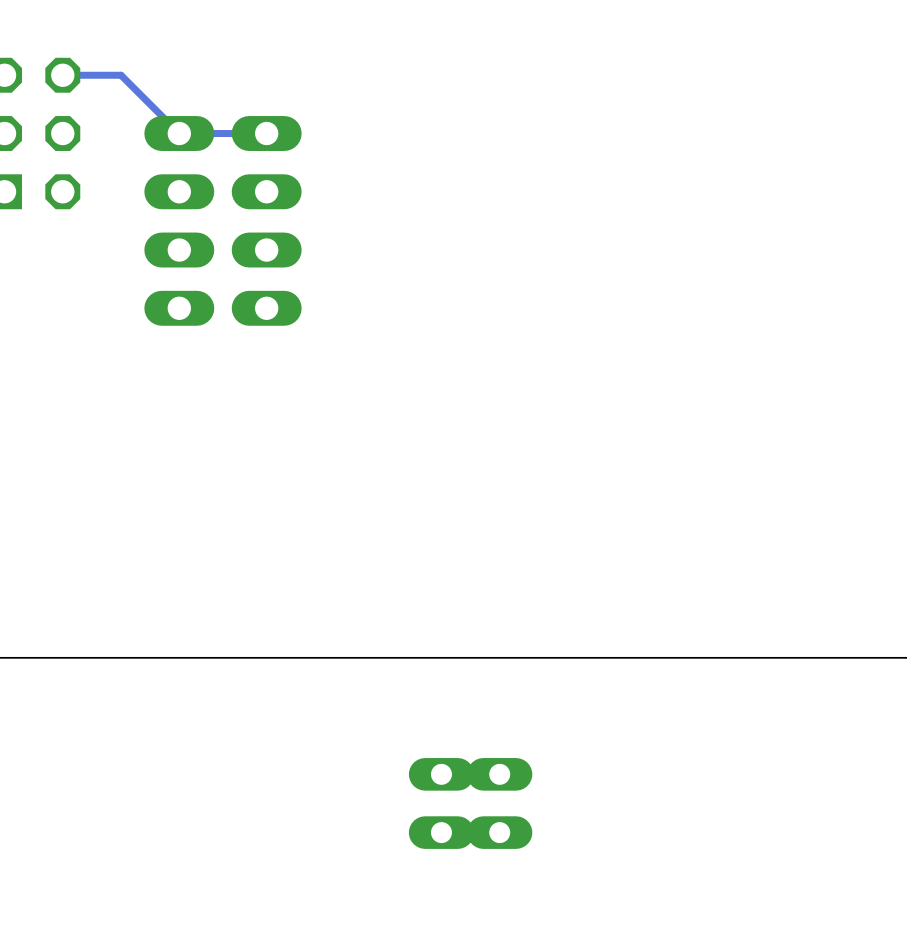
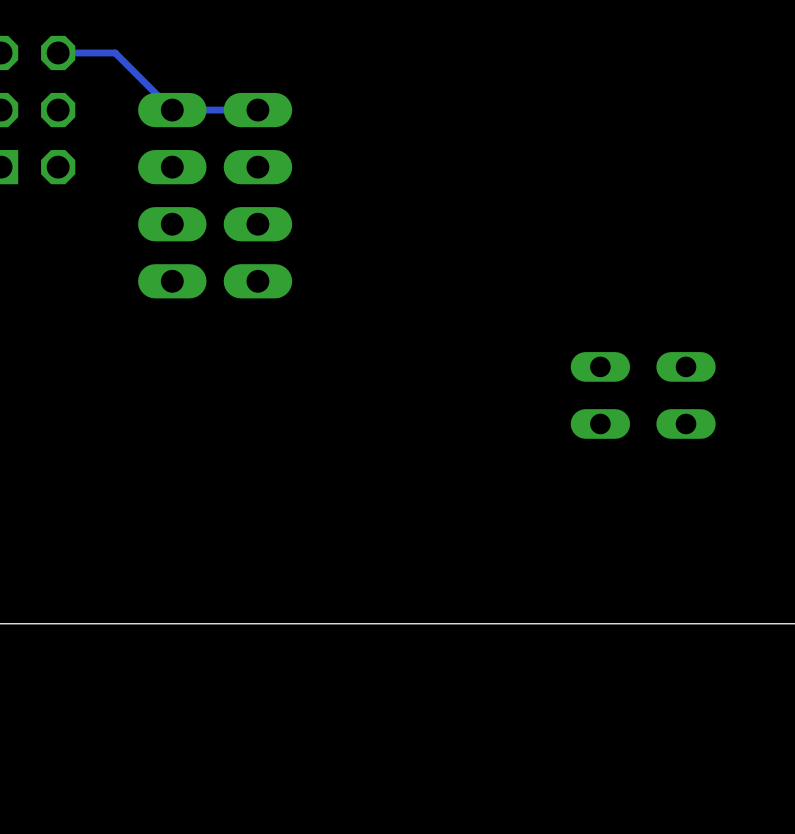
part: none -> (600, 395)
part: none -> (686, 395)
part: (441, 803) -> none
part: (499, 803) -> none

